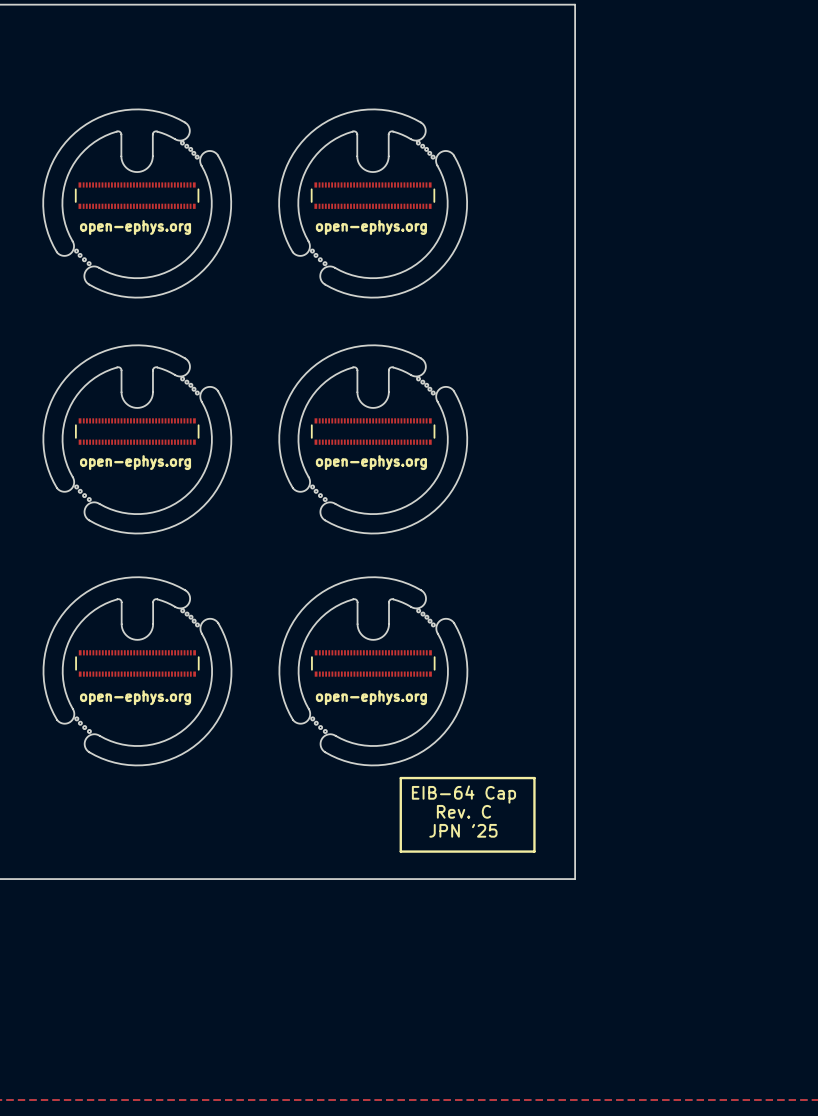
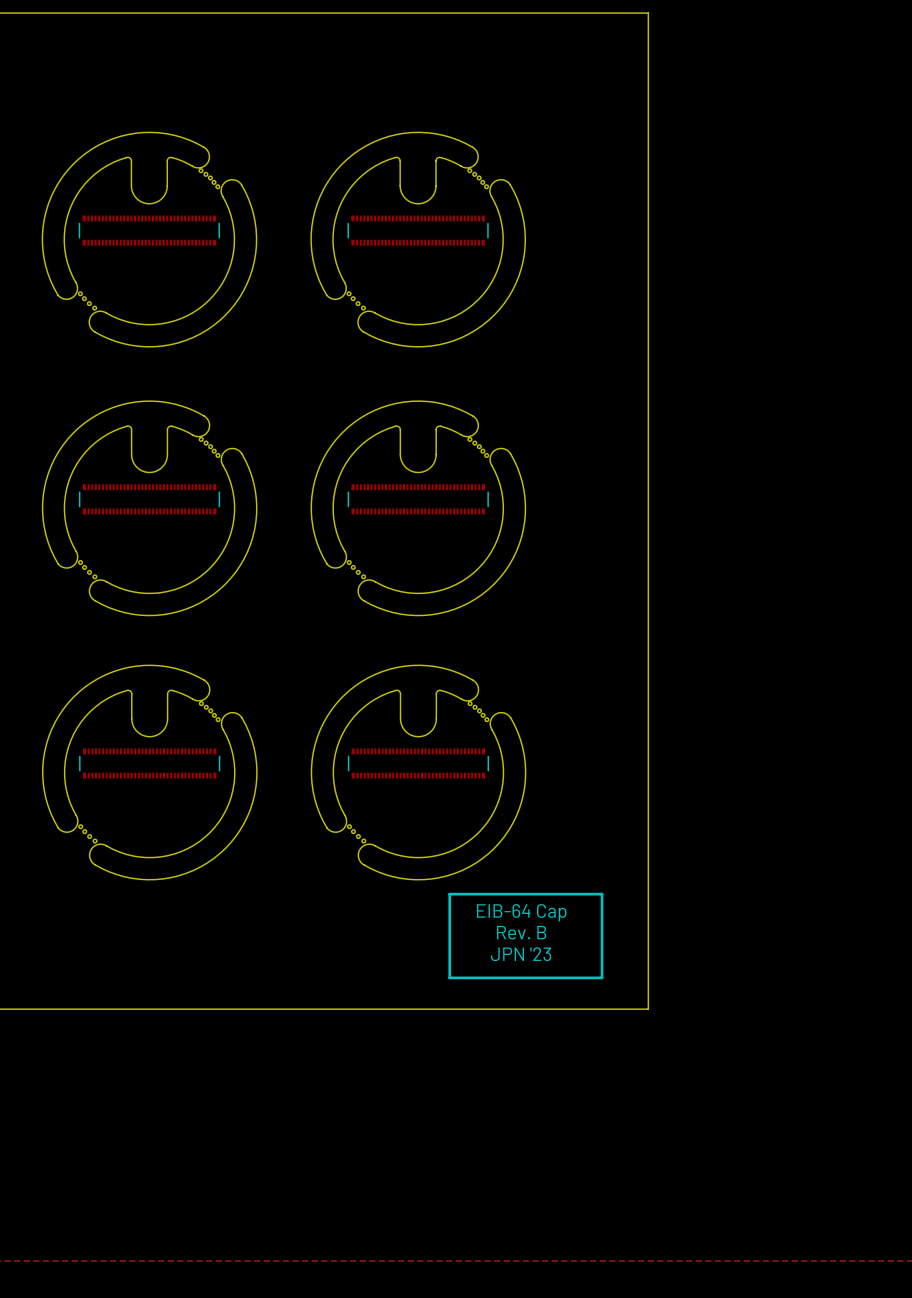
text: open-ephys.org (135, 227) -> none
text: open-ephys.org (371, 227) -> none
text: open-ephys.org (135, 462) -> none
text: open-ephys.org (371, 462) -> none
text: open-ephys.org (135, 697) -> none
text: open-ephys.org (371, 697) -> none
text: Rev. C (463, 811) -> Rev. B (521, 932)
text: JPN '25 (463, 830) -> JPN '23 (521, 954)

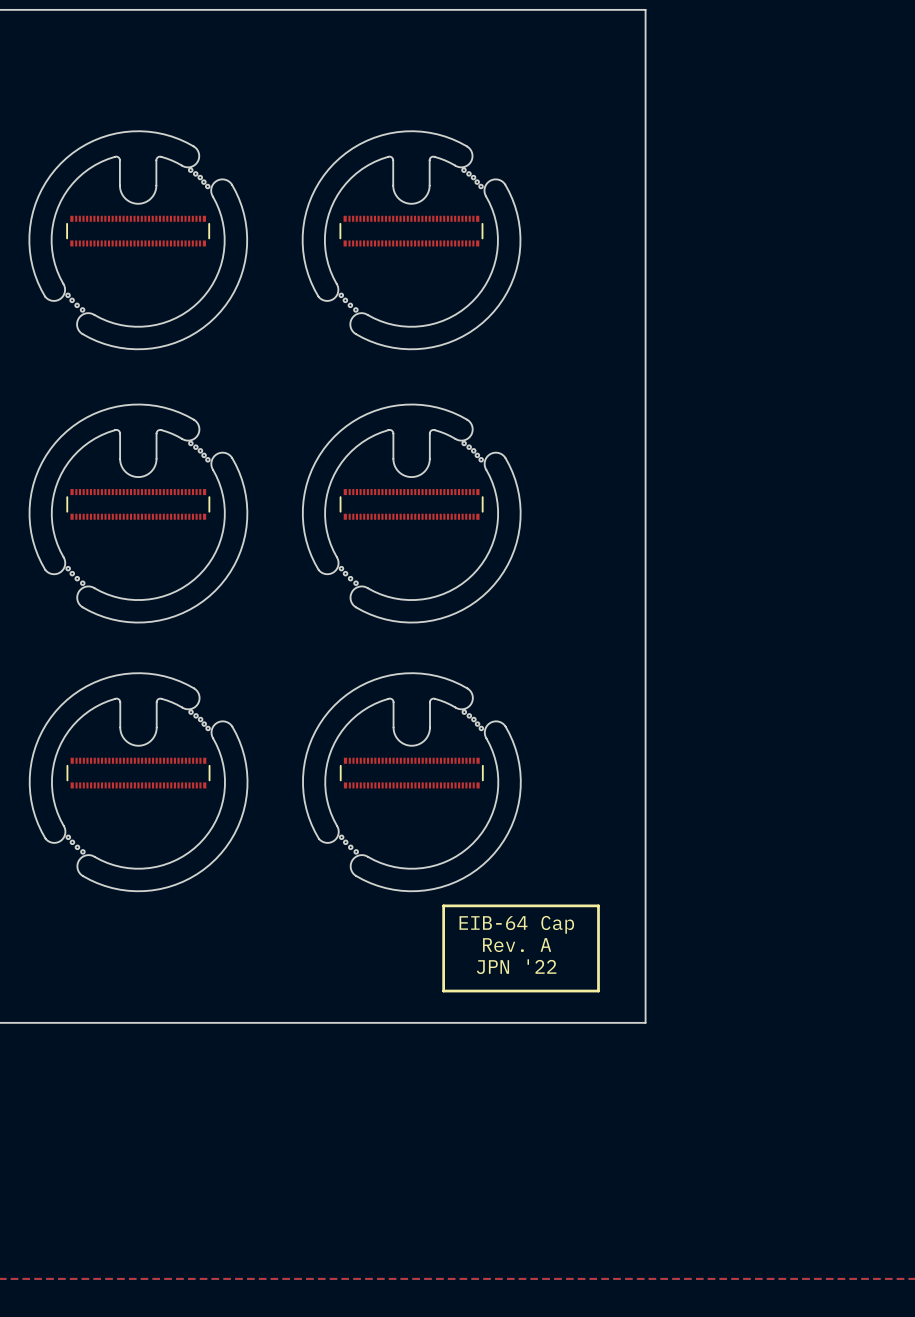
text: Rev. B (521, 932) -> Rev. A (517, 945)
text: JPN '23 (521, 954) -> JPN '22 (516, 966)

